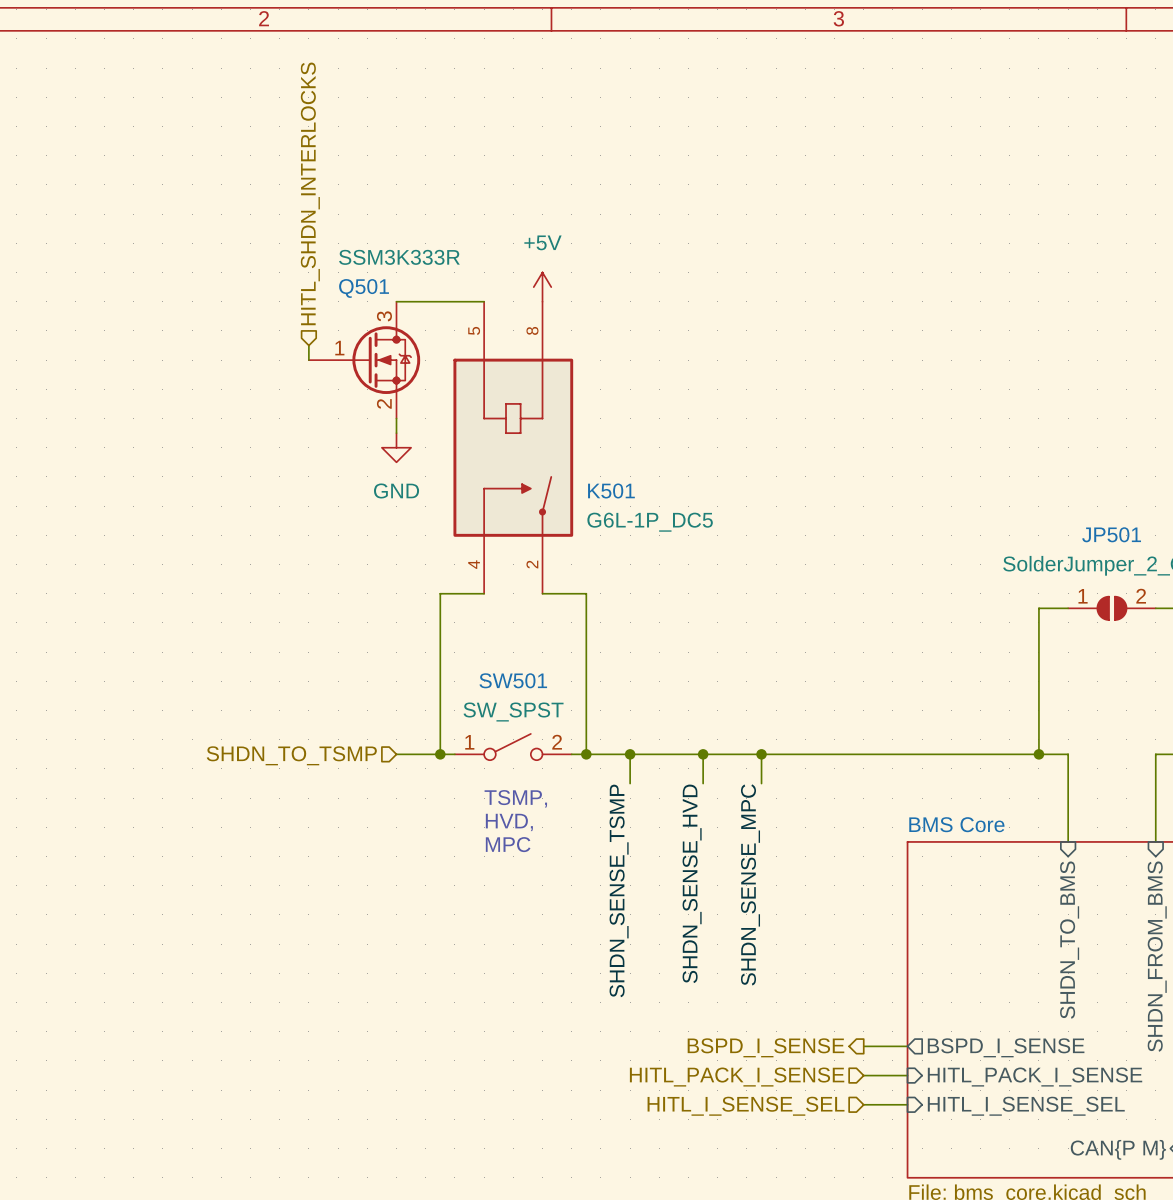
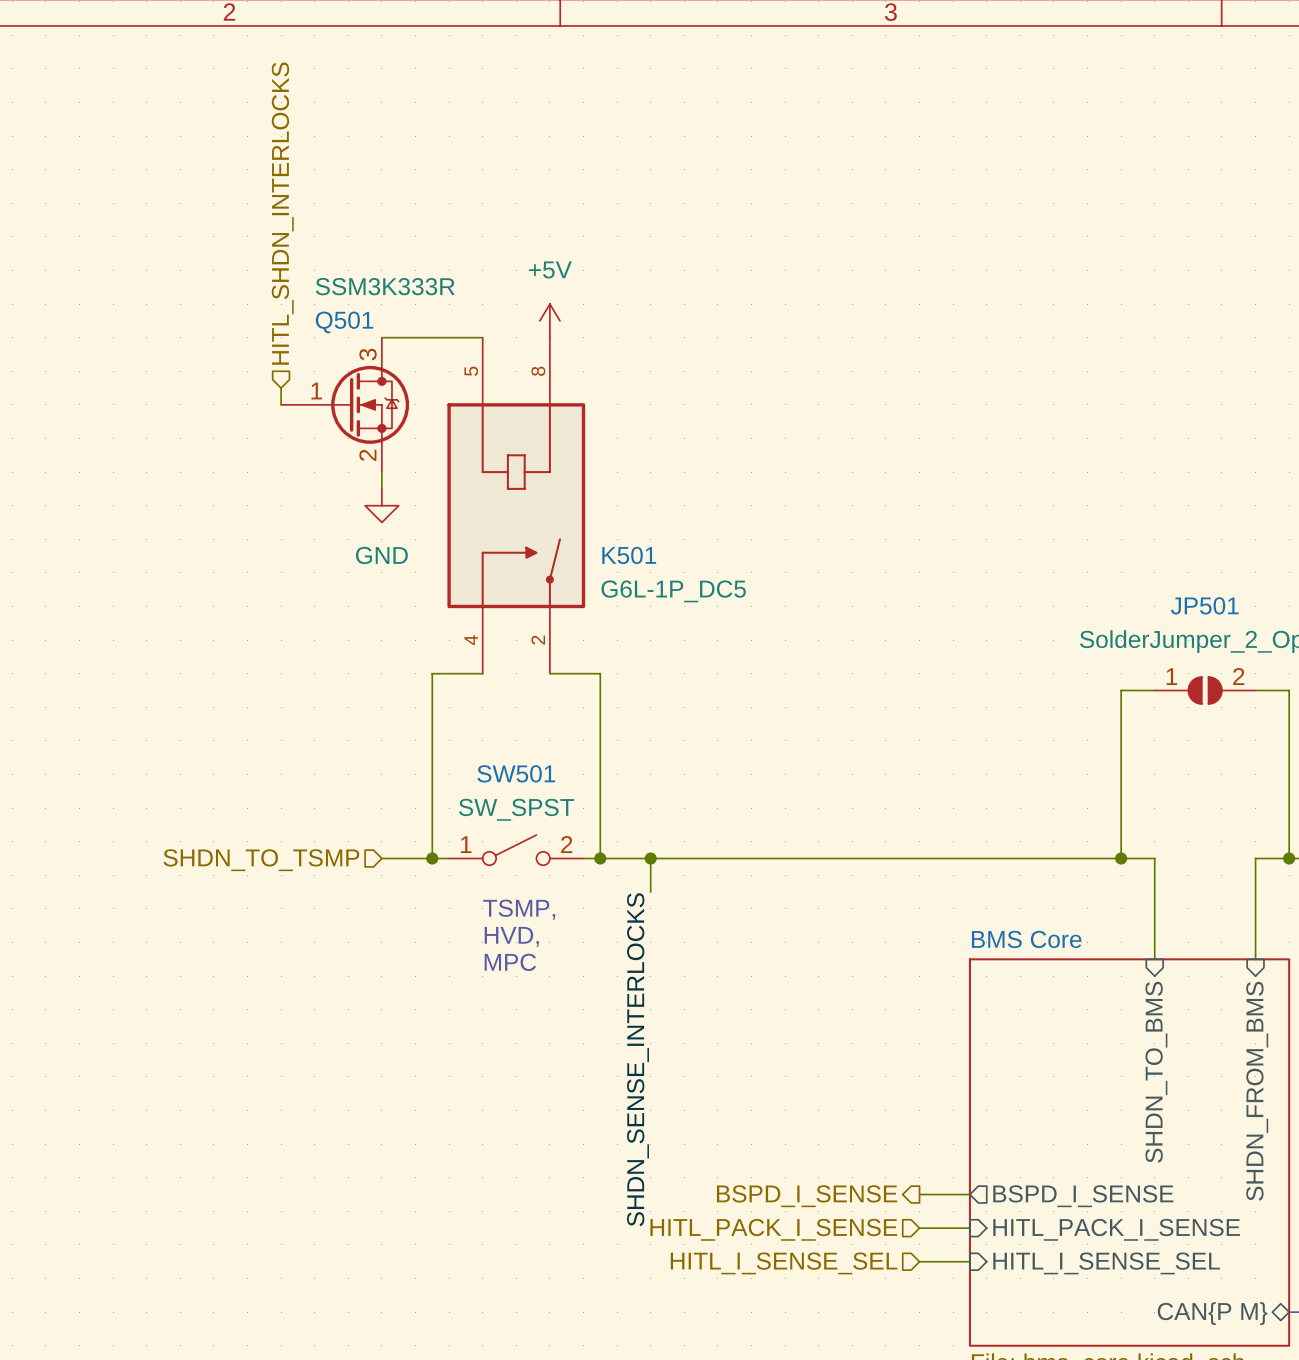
wire: (703, 754) (703, 783) -> none
junction: (703, 754) -> none
wire: (761, 754) (761, 783) -> none
junction: (761, 754) -> none
label: SHDN_SENSE_HVD (692, 883) -> none
label: SHDN_SENSE_MPC (750, 884) -> none
label: SHDN_SENSE_TSMP (619, 890) -> SHDN_SENSE_INTERLOCKS (638, 1059)

